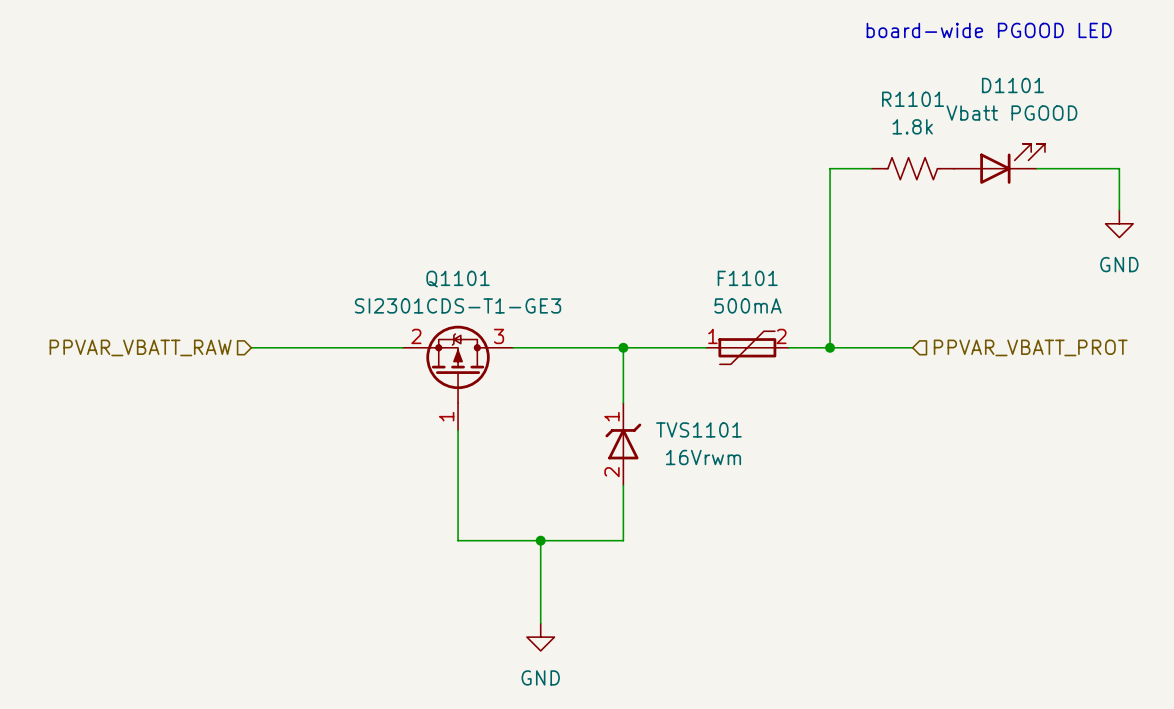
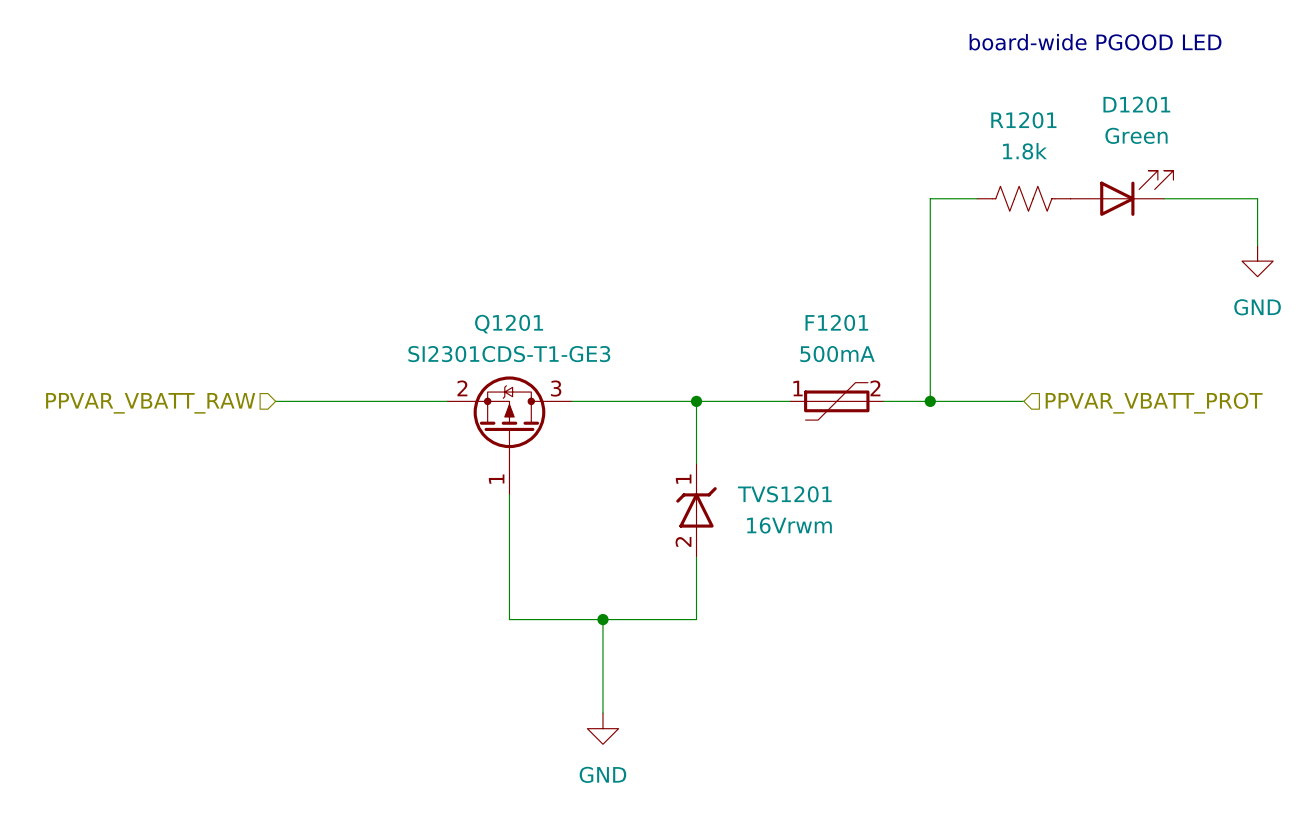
D1101 name: D1101 (1012, 85) -> D1201 (1136, 104)
R1101 name: R1101 (913, 99) -> R1201 (1023, 120)
D1101 value: Vbatt PGOOD (1011, 113) -> Green (1136, 135)
F1101 name: F1101 (747, 278) -> F1201 (836, 322)
Q1101 name: Q1101 (458, 279) -> Q1201 (509, 324)
TVS1101 name: TVS1101 (698, 429) -> TVS1201 (784, 494)

